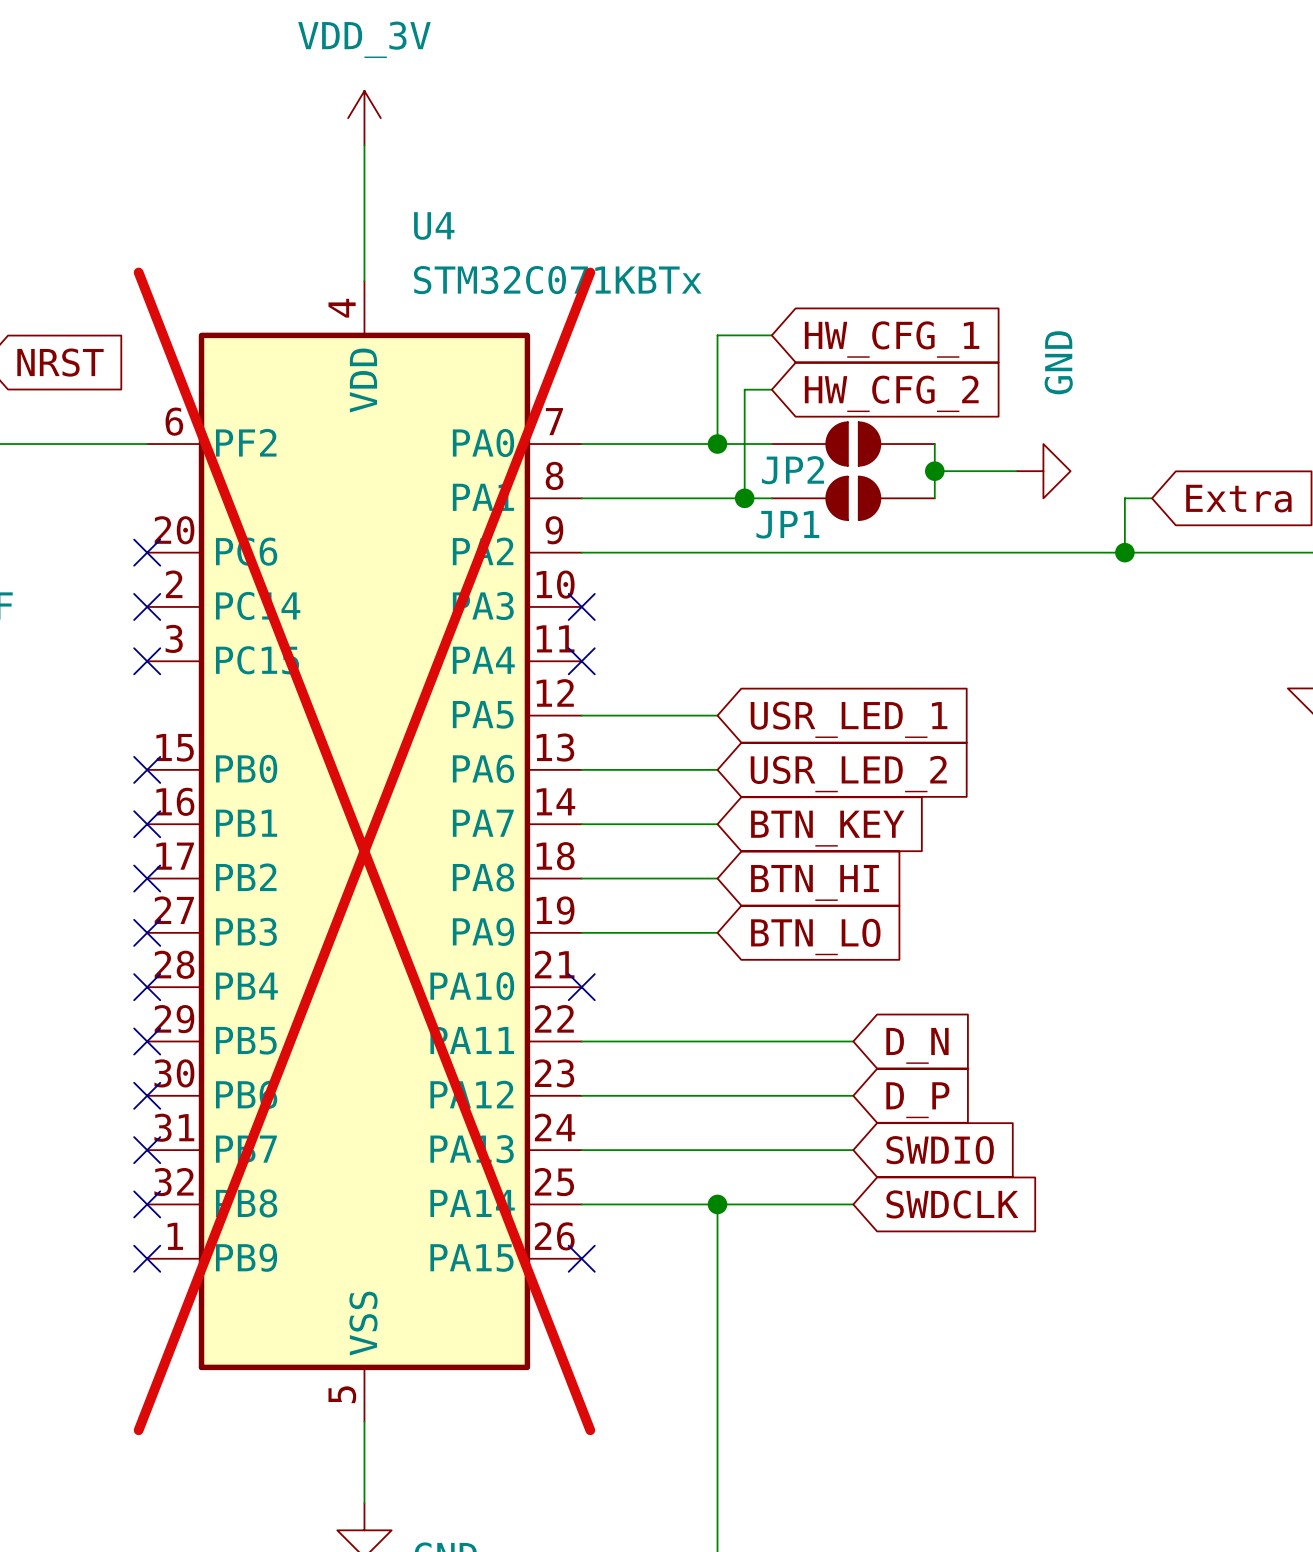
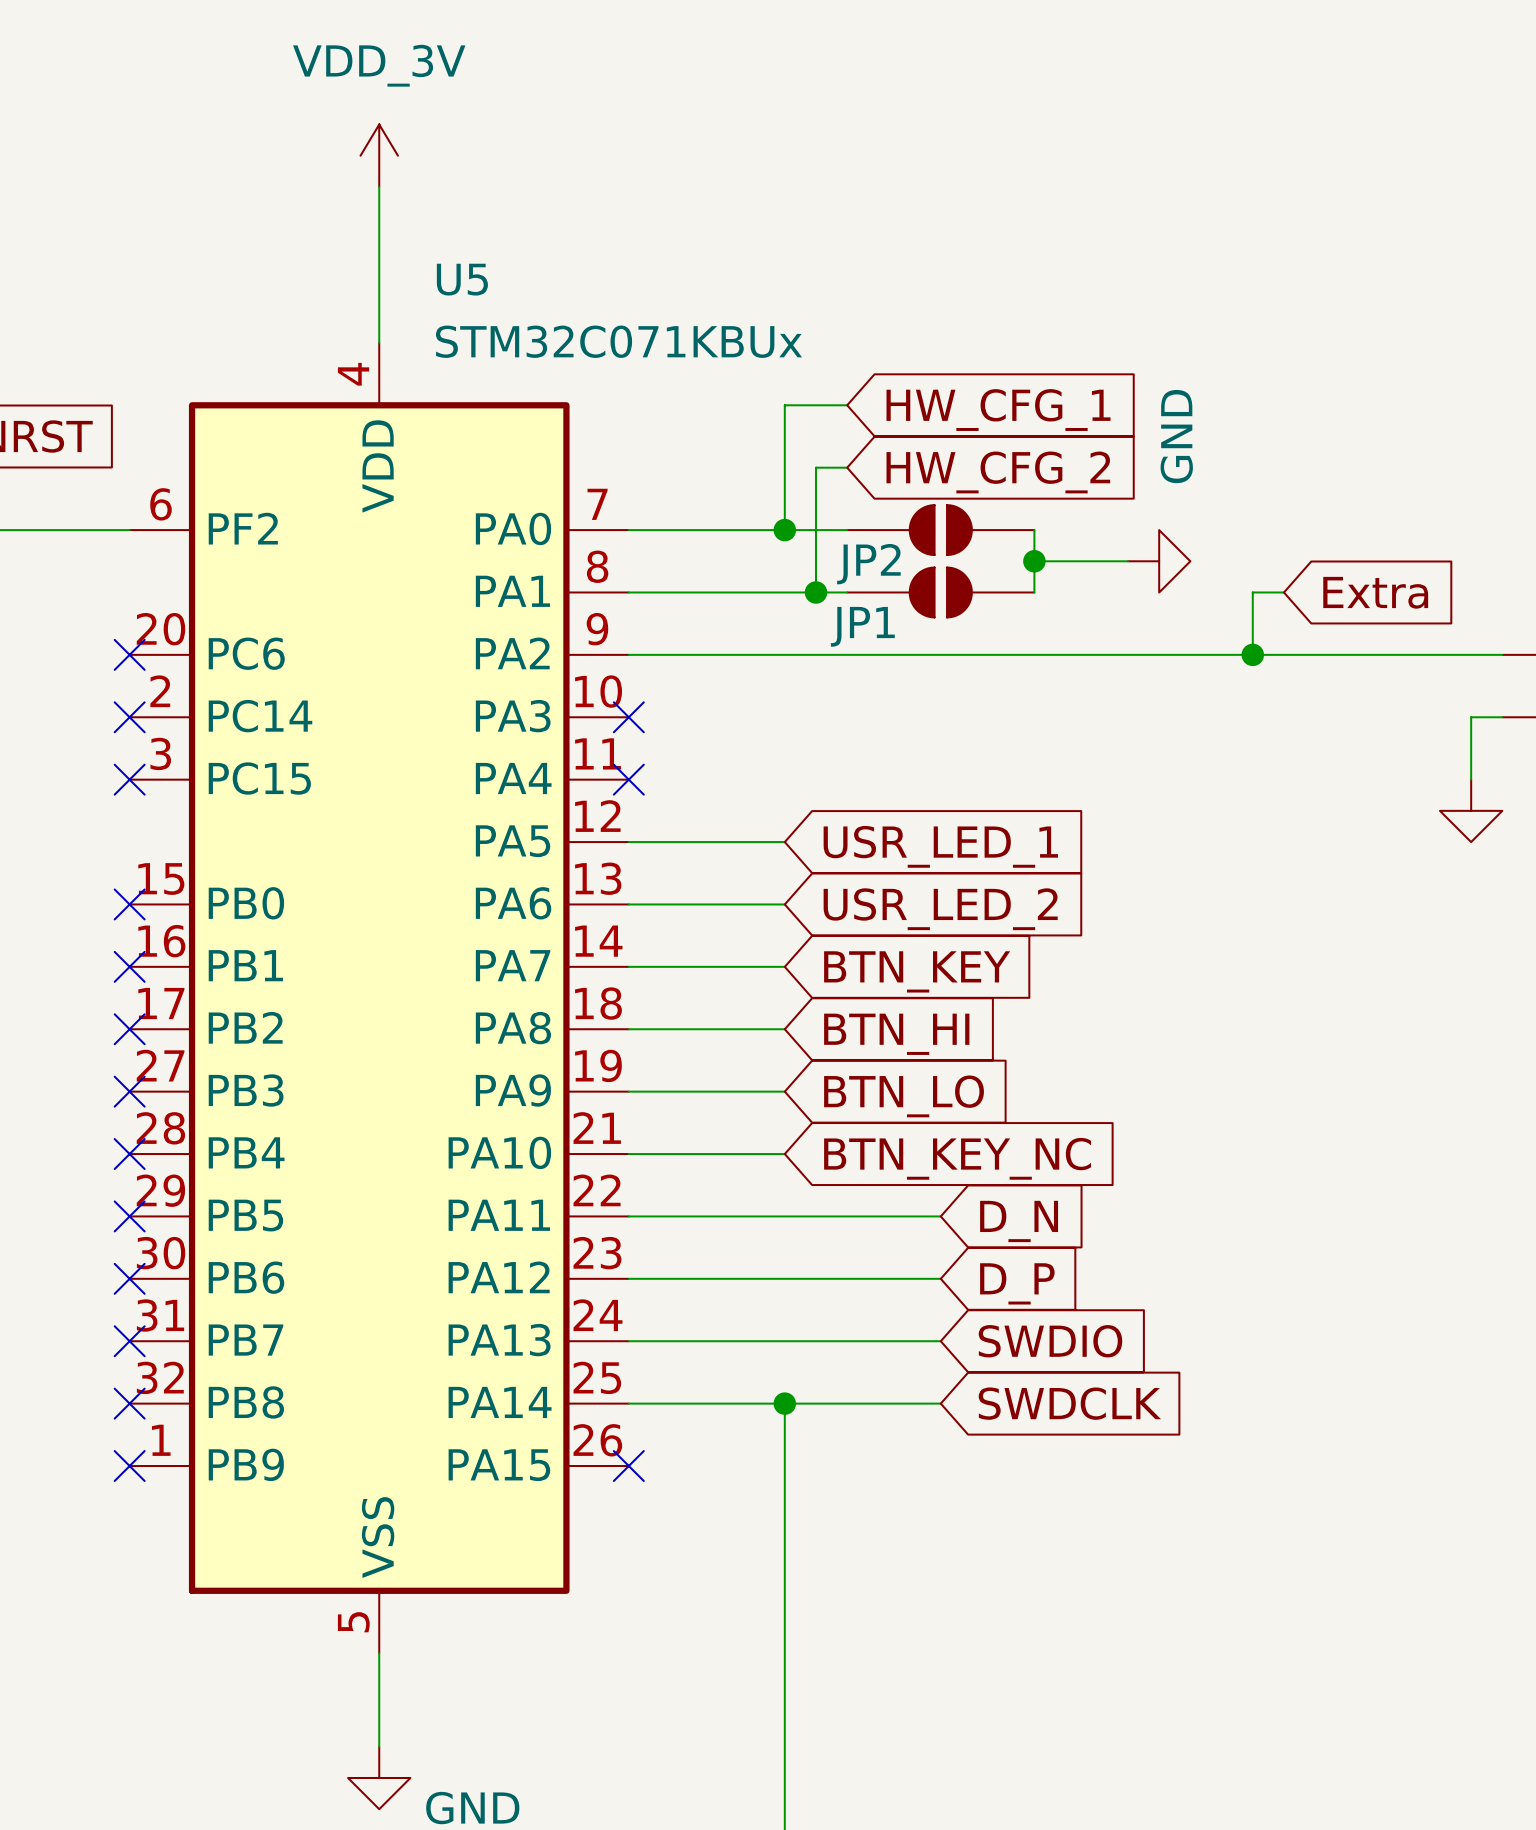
U4 name: U4 (434, 226) -> U5 (462, 279)
U4 value: STM32C071KBTx (557, 280) -> STM32C071KBUx (618, 341)
U4 do-not-place cross: (364, 851) -> none
wire: none -> (628, 1154) (784, 1154)
no-connect mark: (581, 987) -> none
global label: none -> BTN_KEY_NC (957, 1158)

